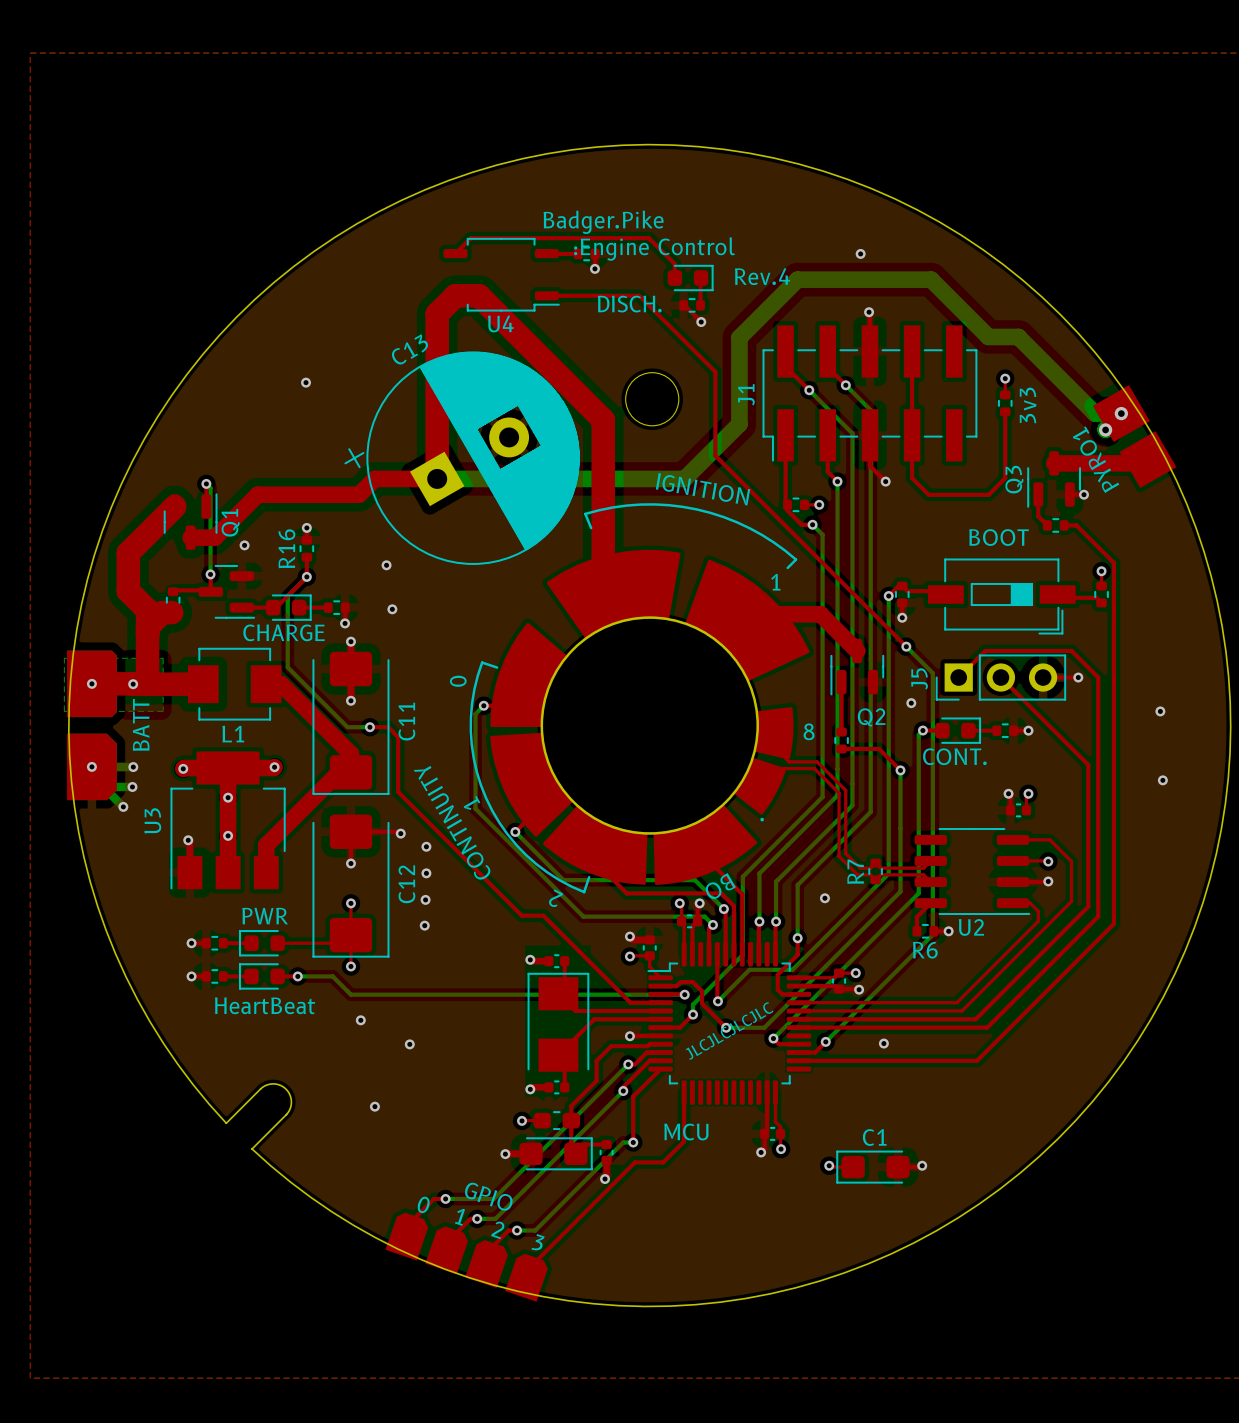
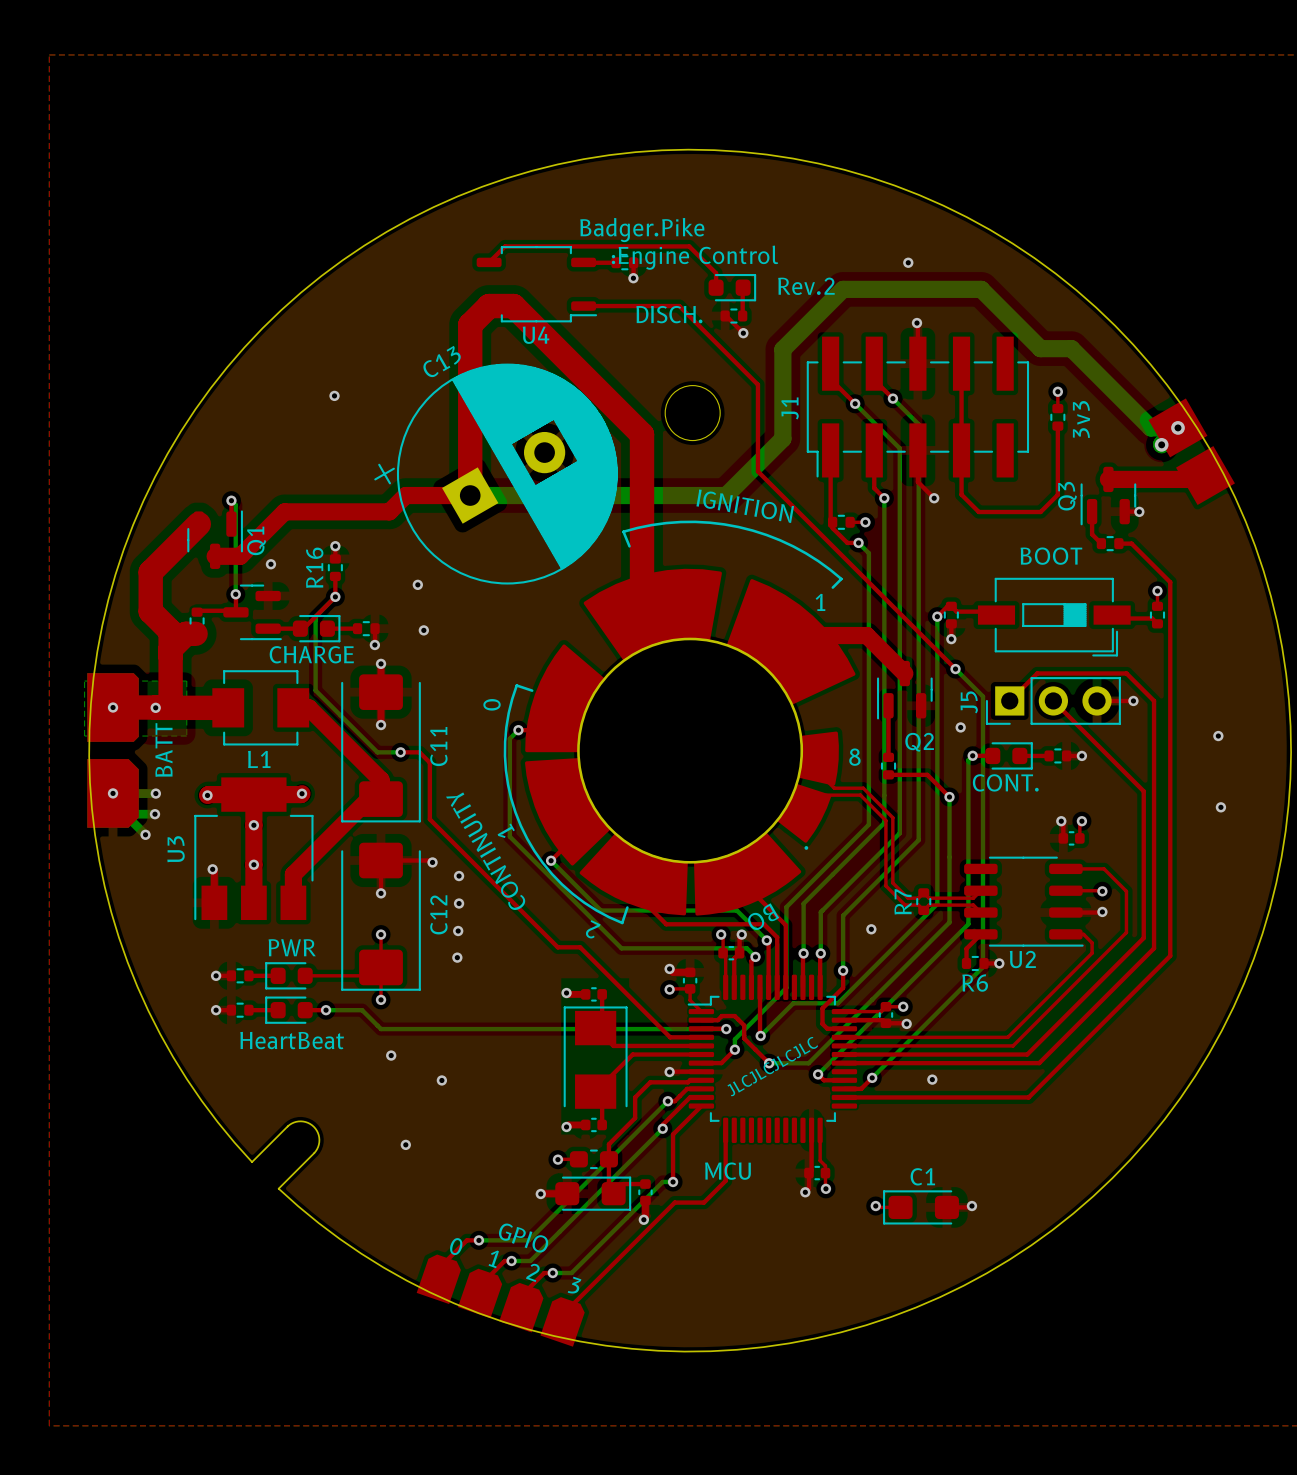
text: Rev.4 (762, 276) -> Rev.2 (806, 286)
text: PYRO1 (1096, 459) -> none

